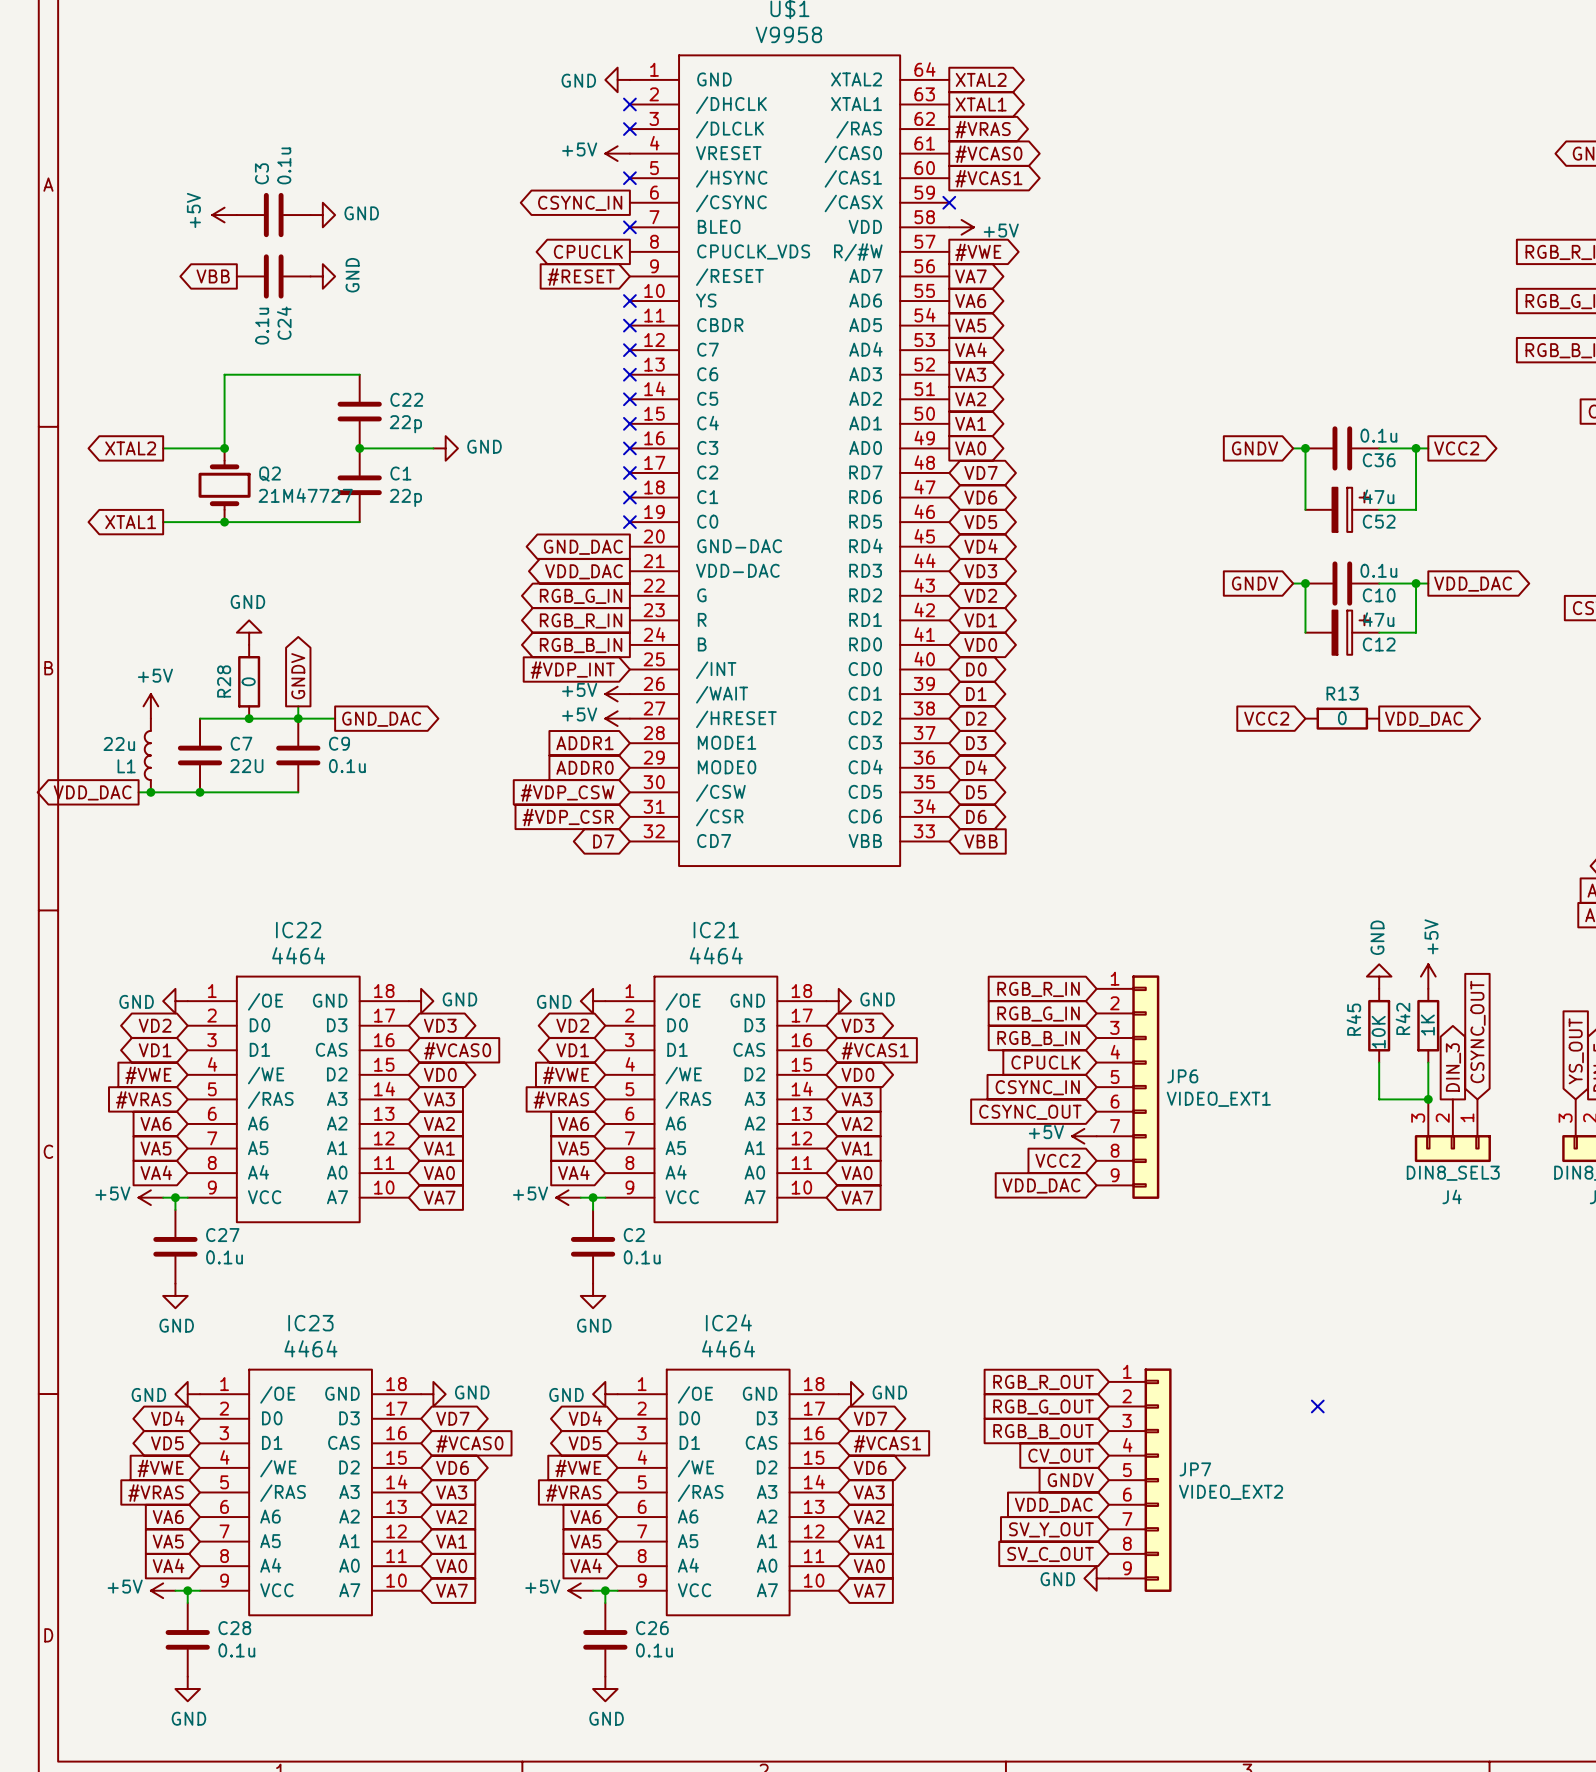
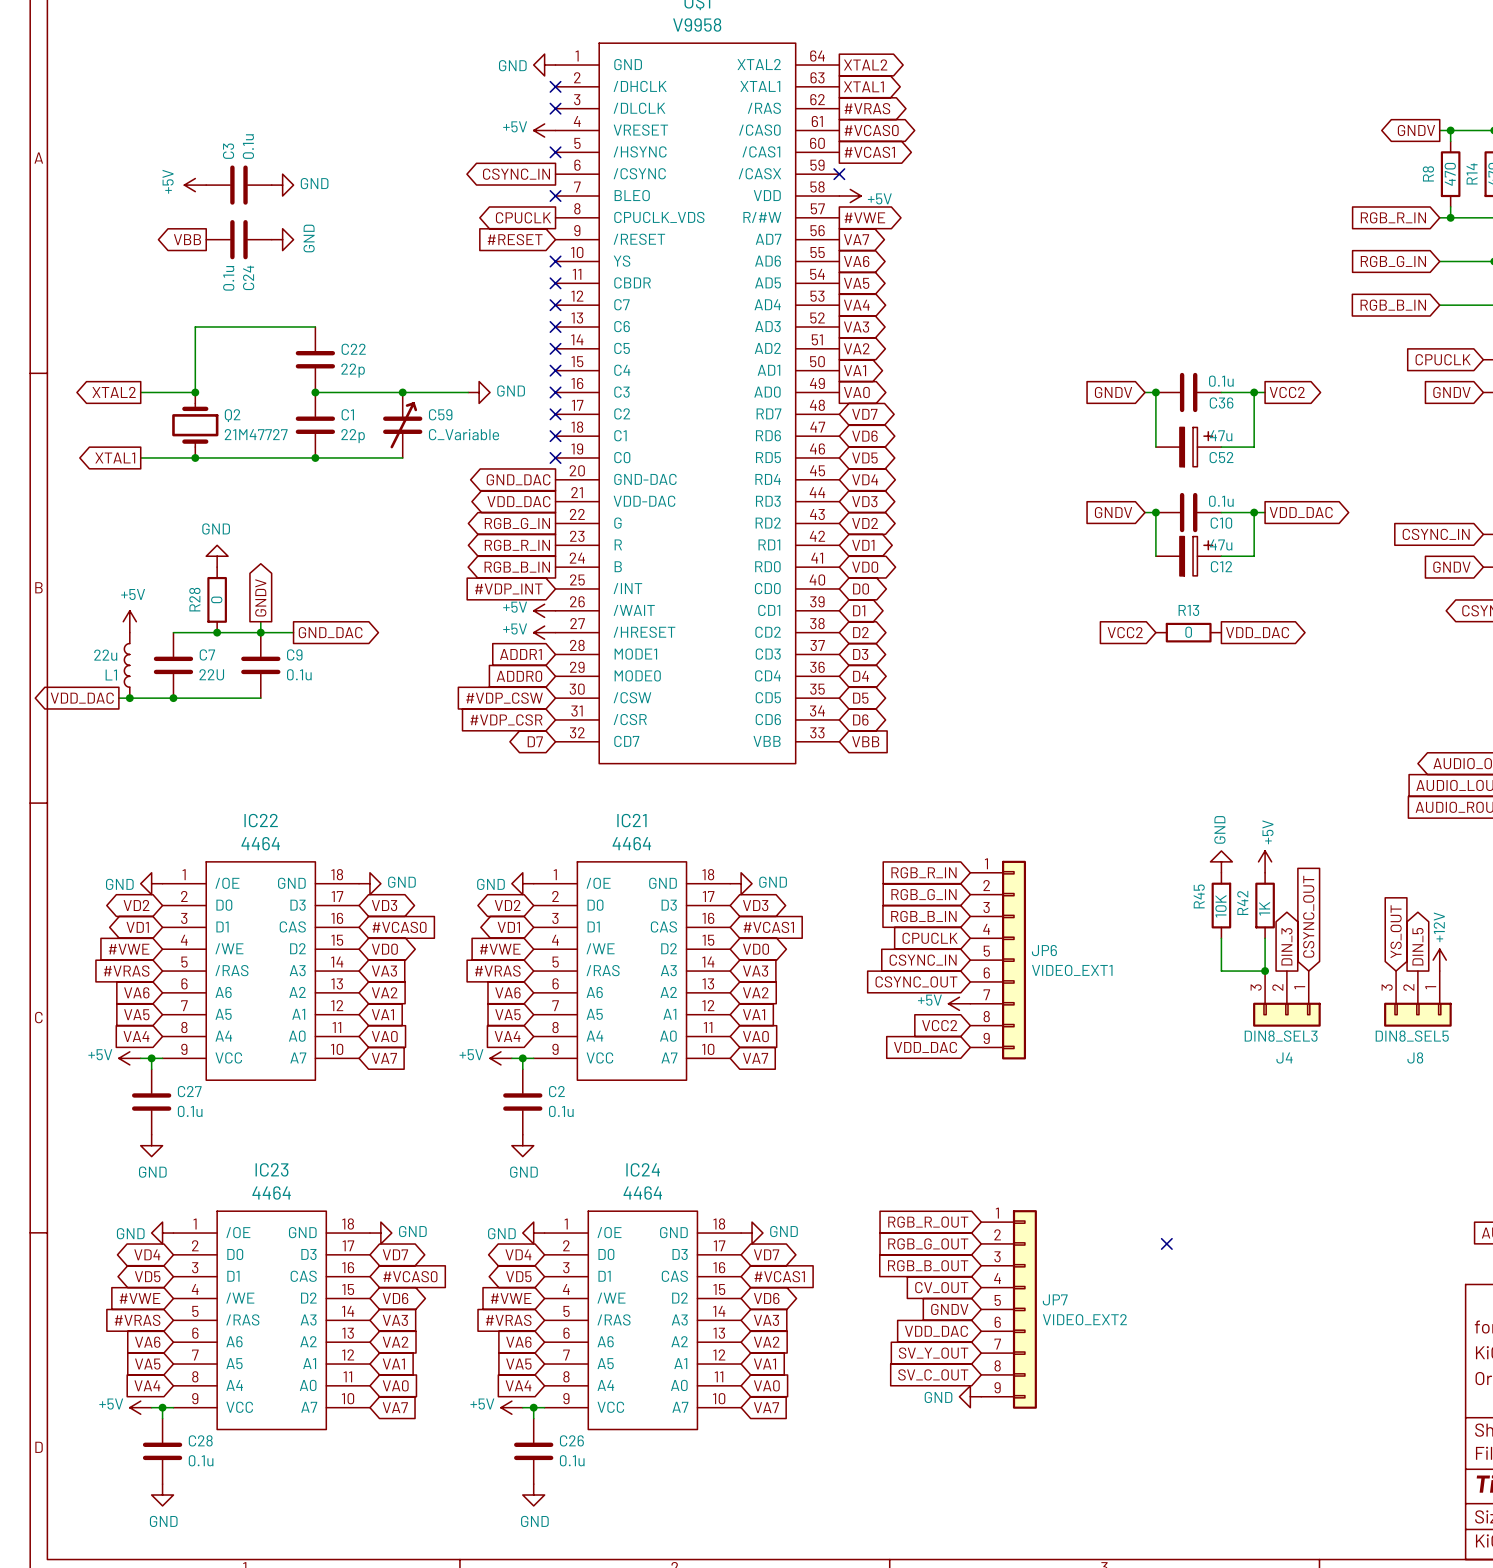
wire: none -> (380, 392) (468, 392)
power symbol position: GND (445, 448) -> GND (479, 392)
junction: none -> (402, 392)
C59: none -> C_Variable (402, 425)
wire: none -> (315, 457) (402, 457)
junction: none -> (315, 457)

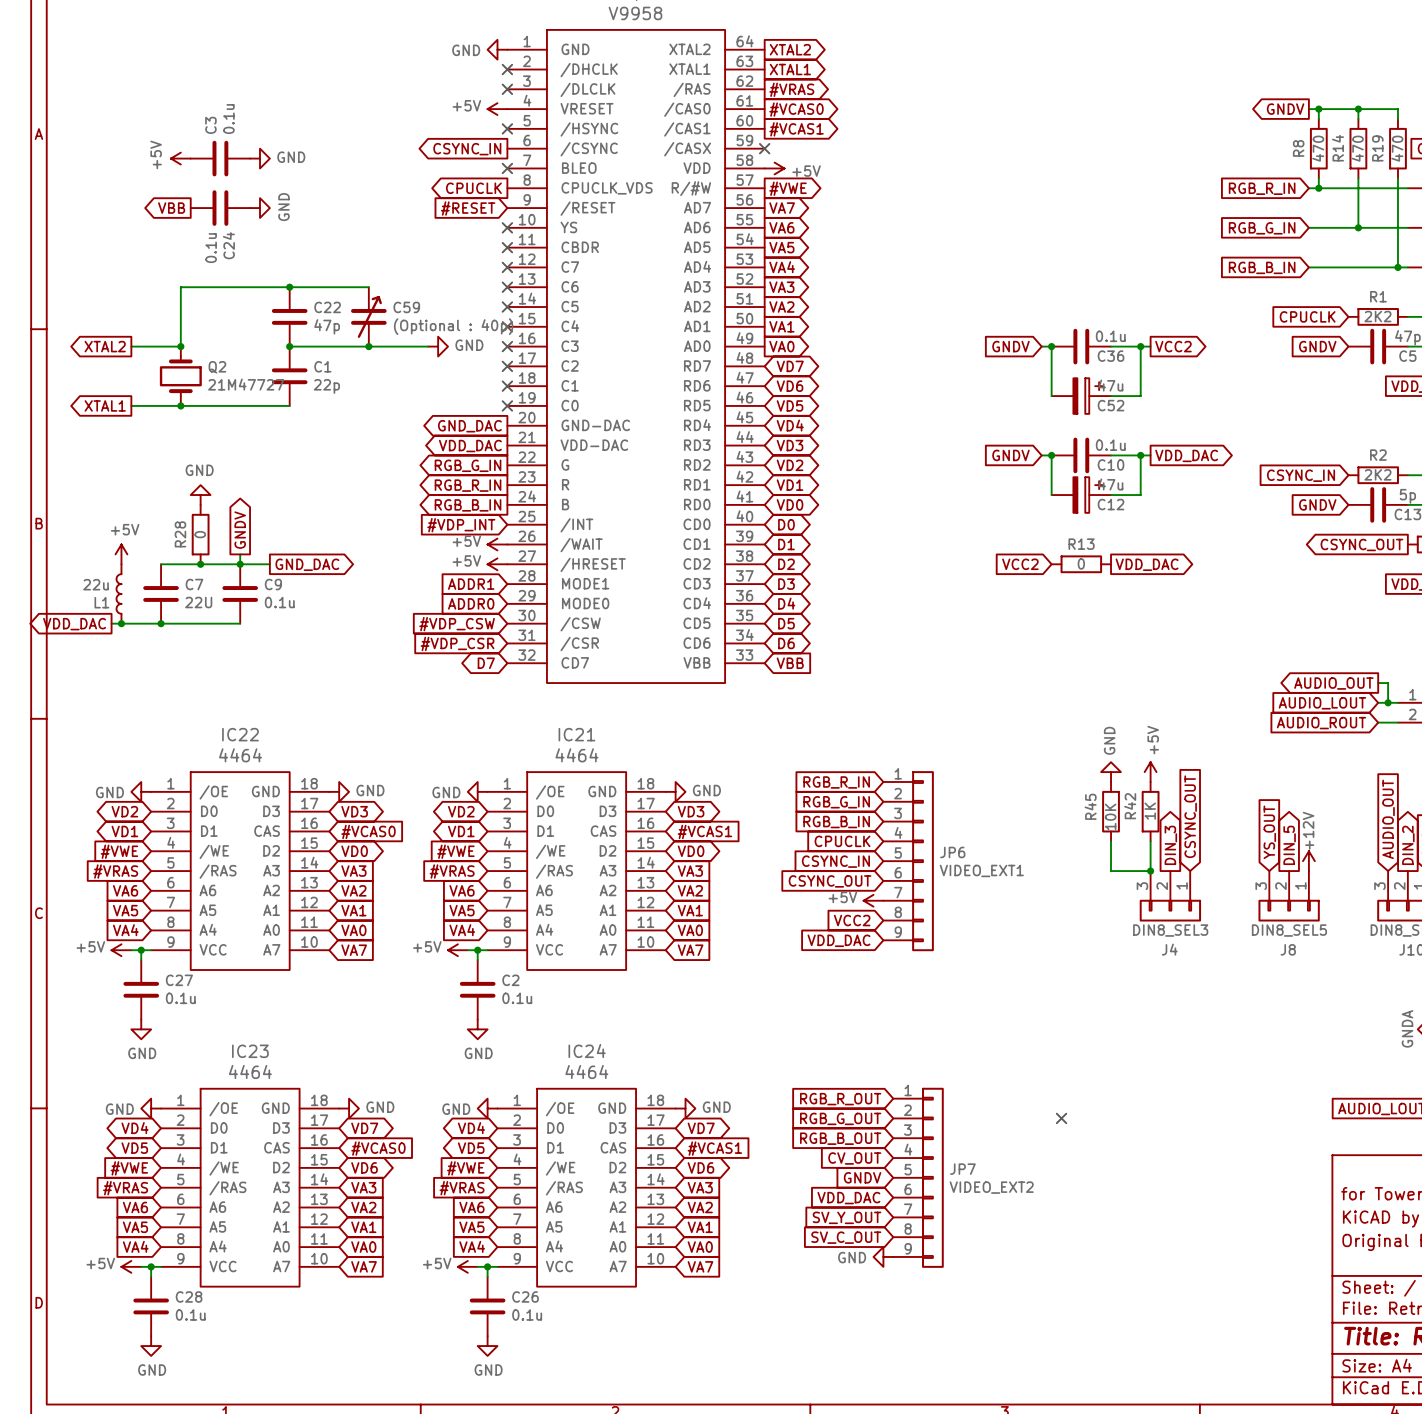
junction: none -> (289, 287)
C22 value: 22p (353, 370) -> 47p (327, 326)
C59 position: (402, 425) -> (368, 316)
C59 value: C_Variable (464, 434) -> (Optional : 40p) (453, 326)
wire: (315, 457) (402, 457) -> (289, 287) (368, 287)
junction: (315, 457) -> none

